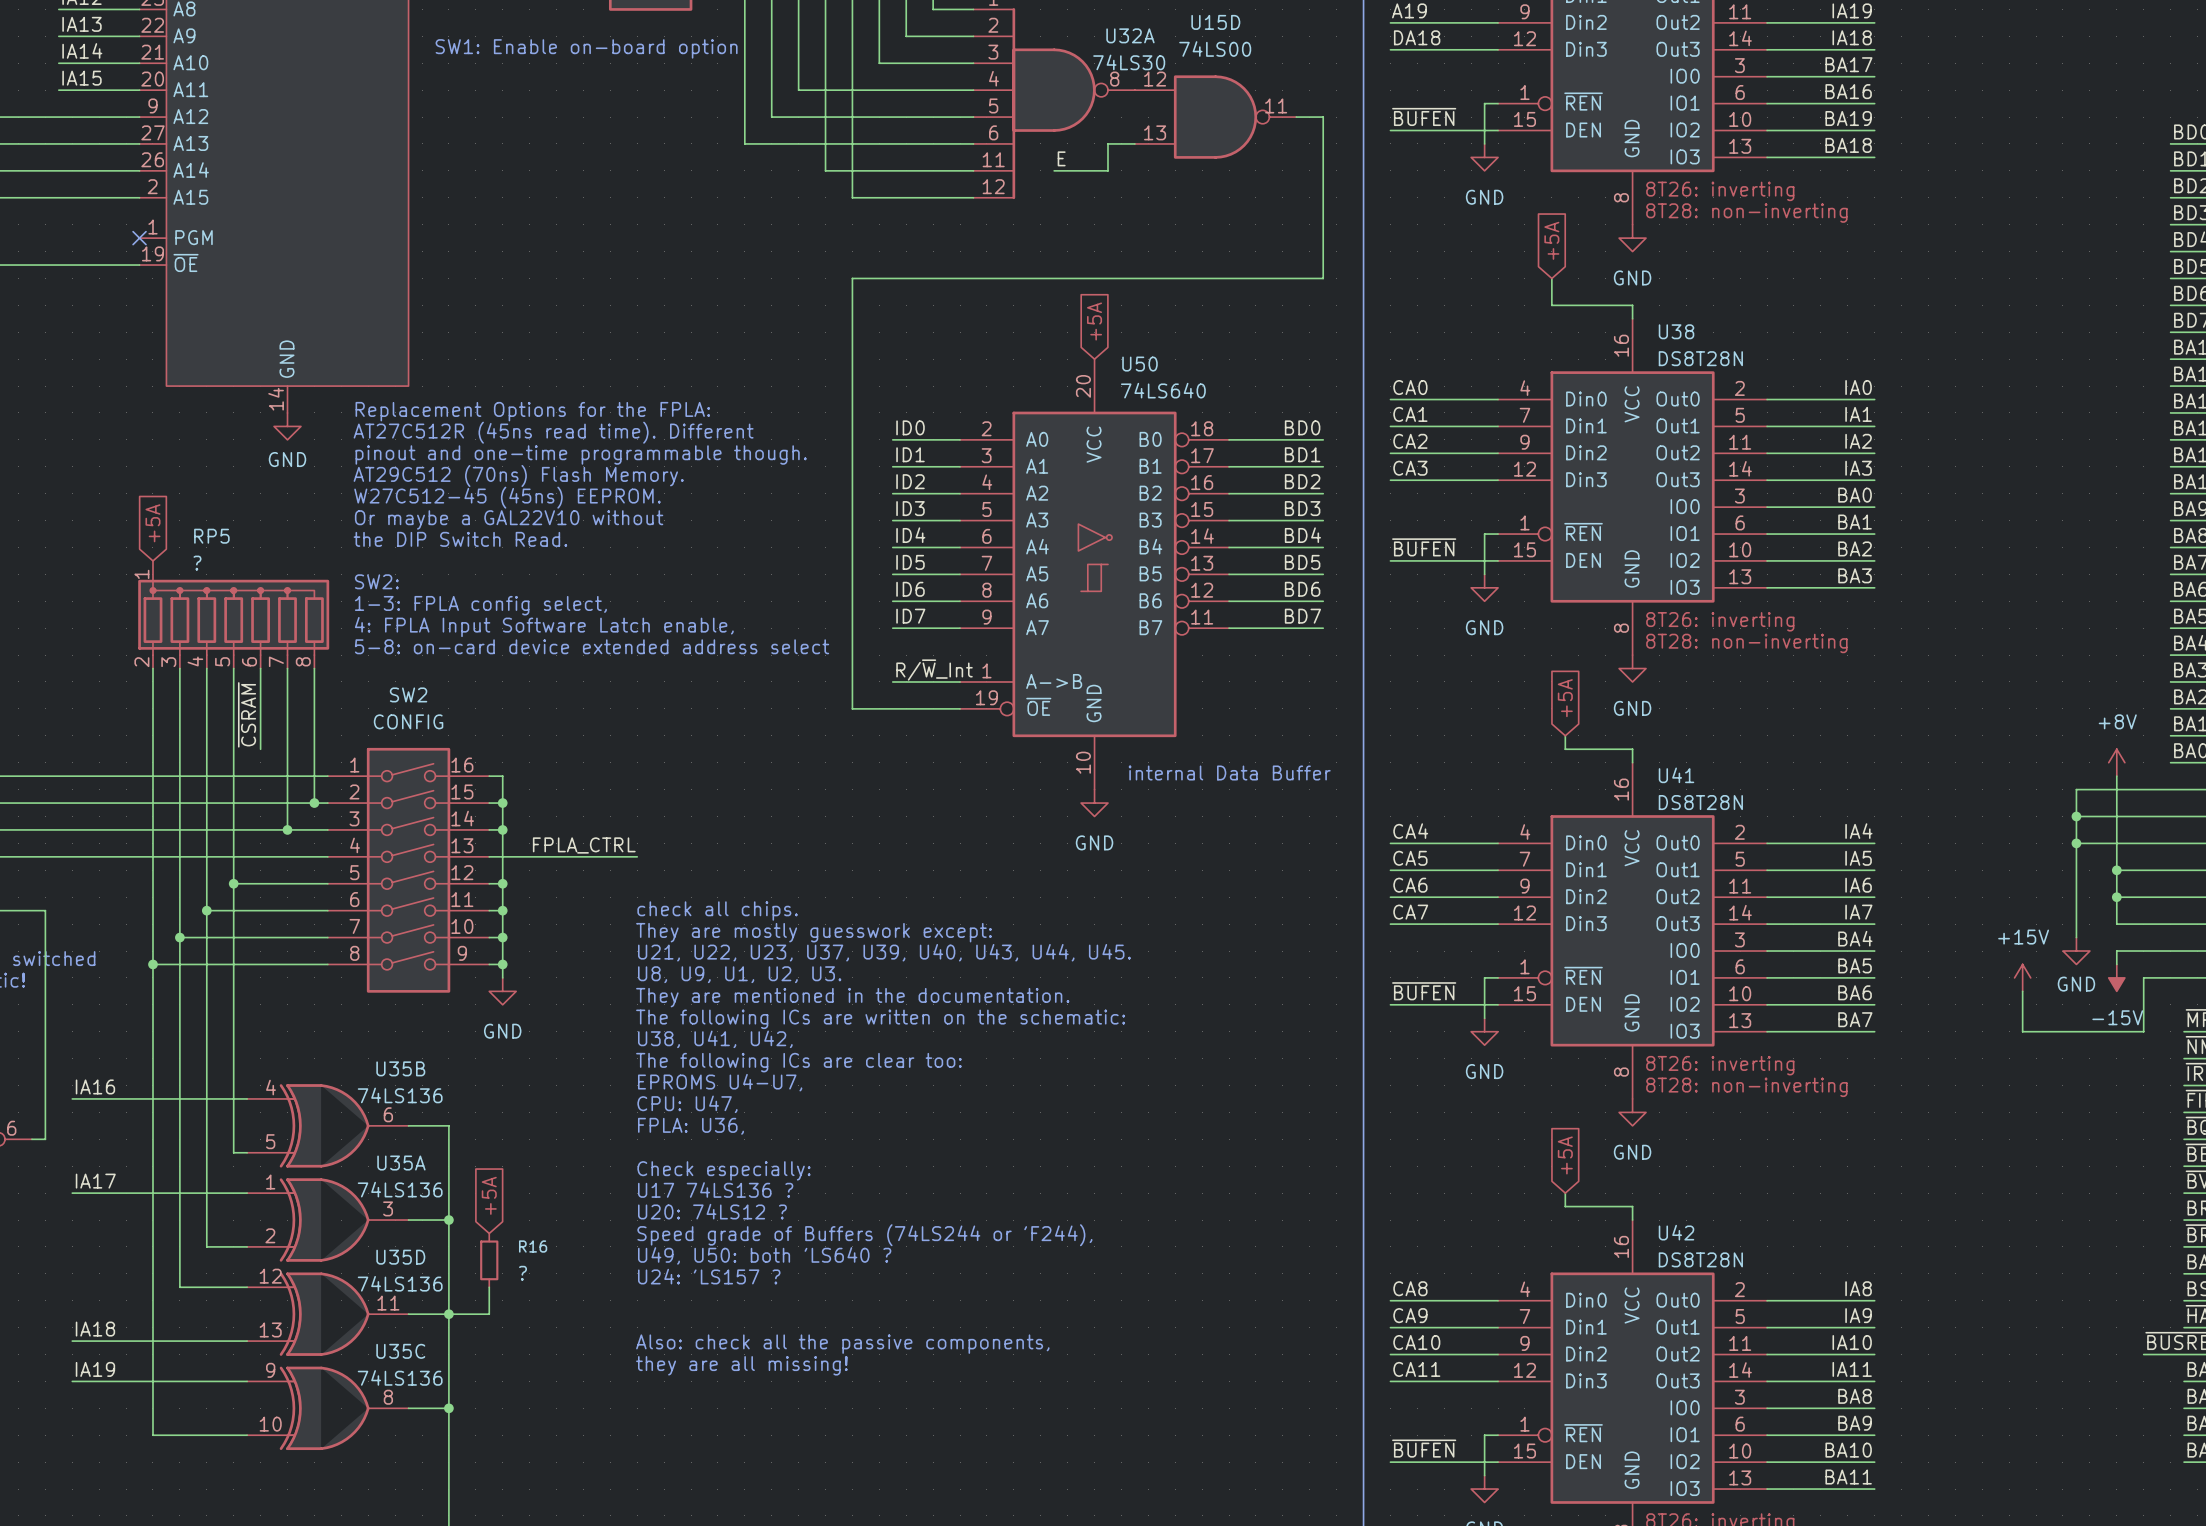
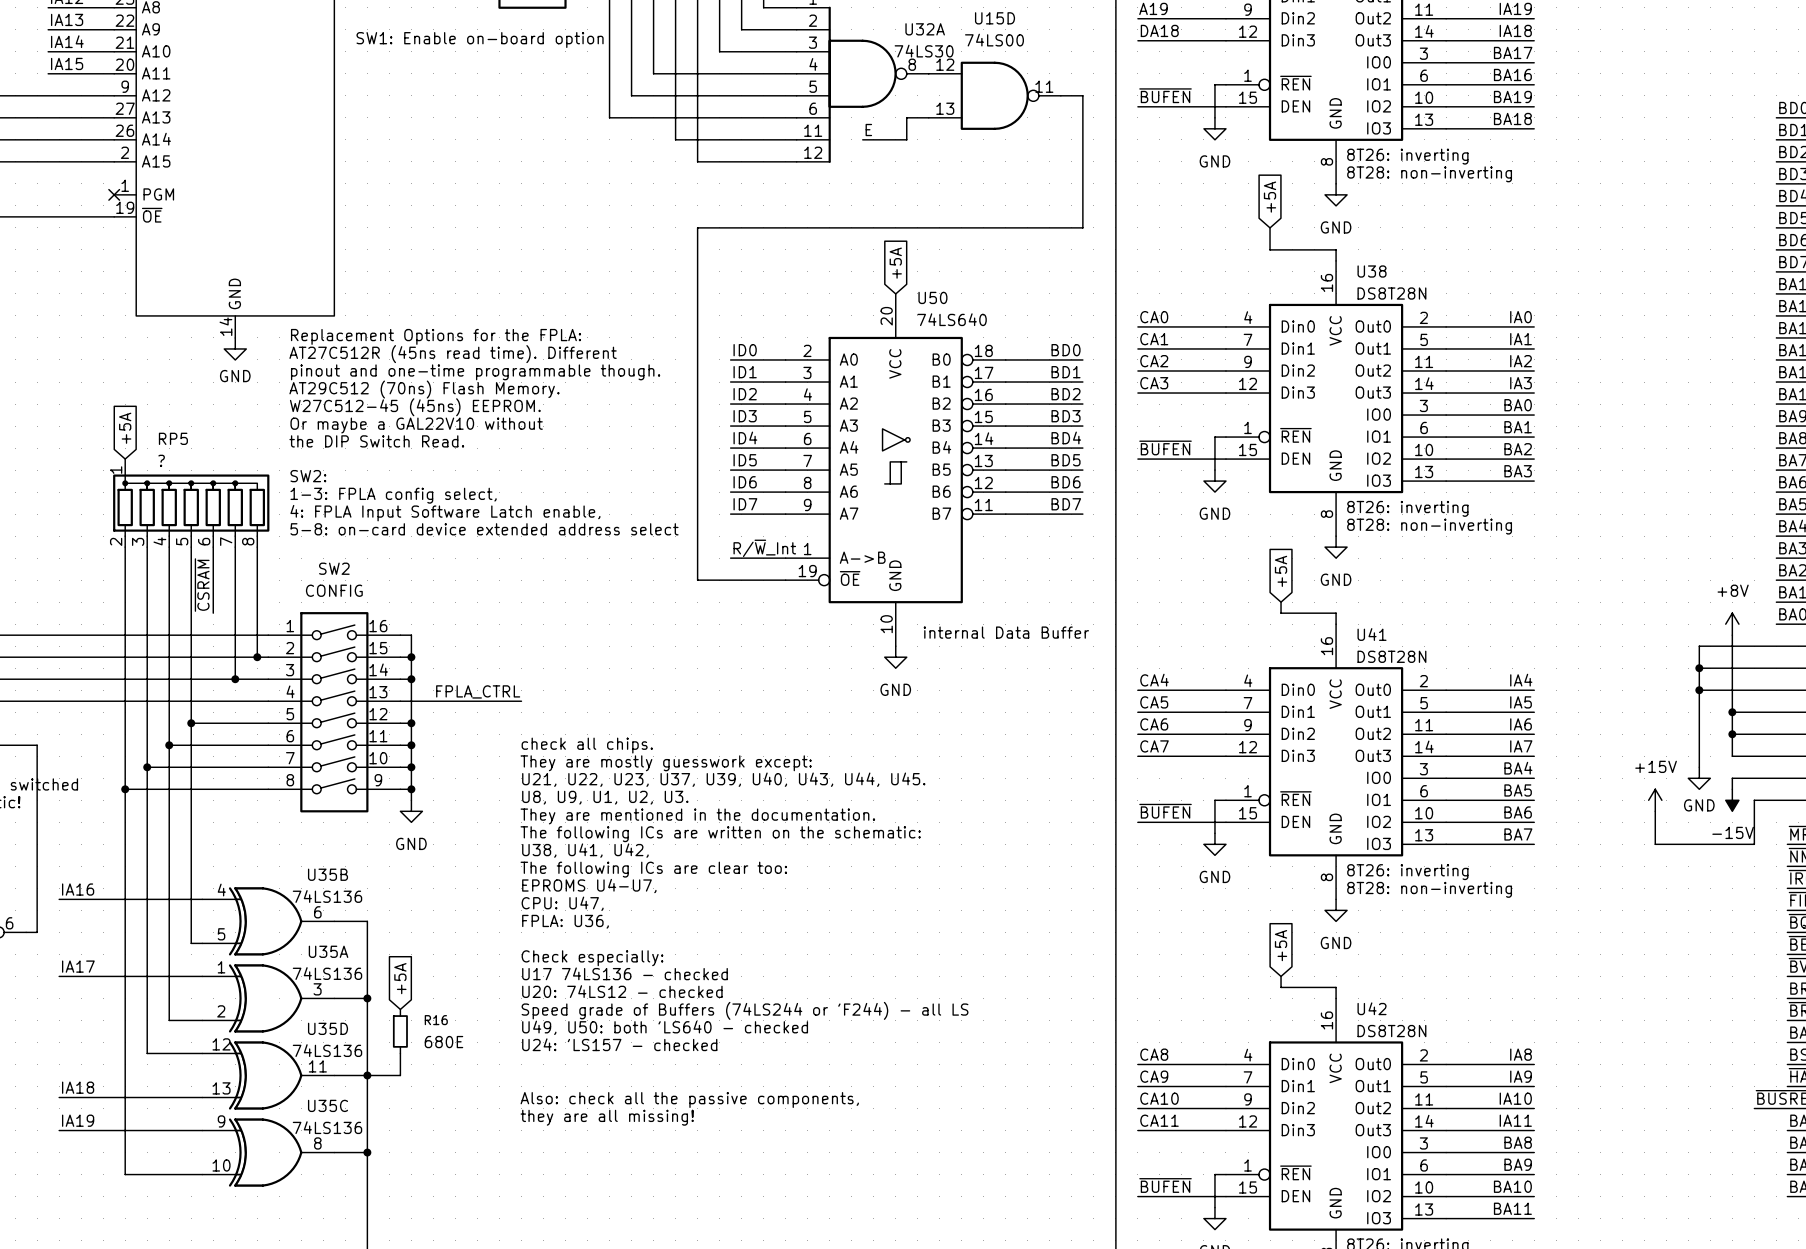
text: U17 74LS136 ? (715, 1189) -> U17 74LS136 - checked (624, 973)
text: U20: 74LS12 ? (712, 1211) -> U20: 74LS12 - checked (622, 991)
text: Speed grade of Buffers (74LS244 or 'F244), (864, 1235) -> Speed grade of Buffers (74LS244 or 'F244) - all LS (745, 1010)
text: U49, U50: both 'LS640 ? (764, 1255) -> U49, U50: both 'LS640 - checked (665, 1027)
R16 value: ? (522, 1273) -> 680E (443, 1042)
text: U24: 'LS157 ? (709, 1276) -> U24: 'LS157 - checked (619, 1044)

